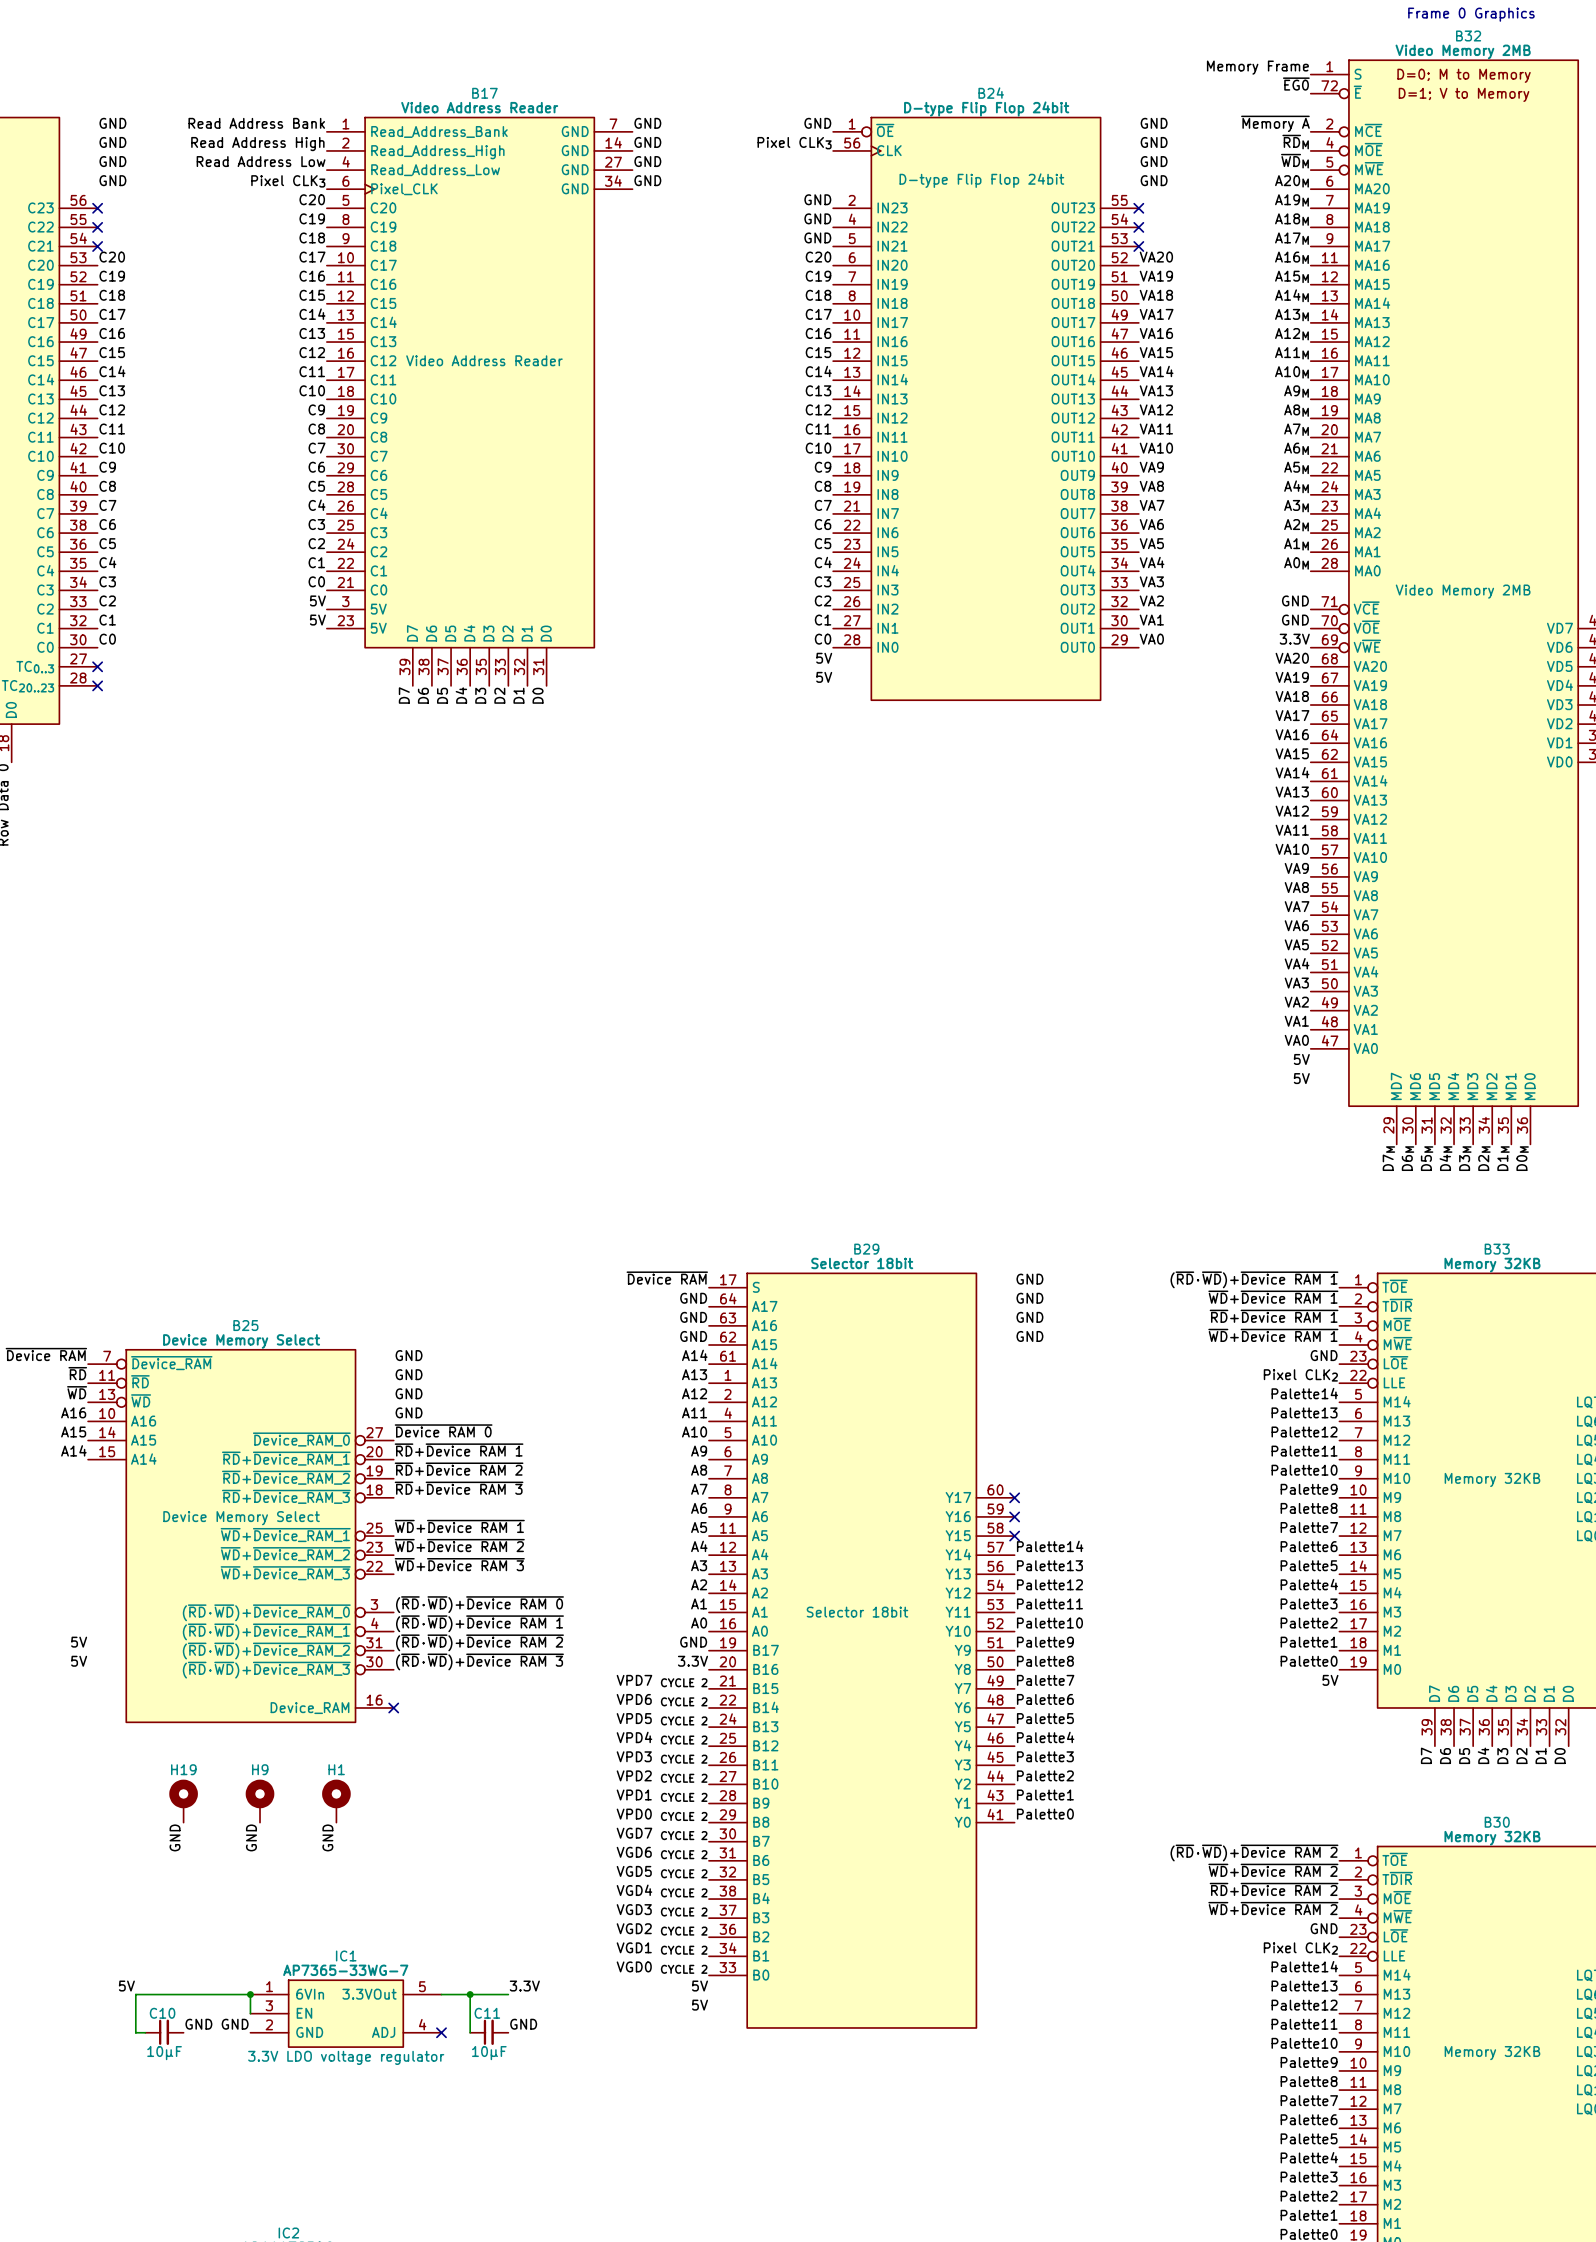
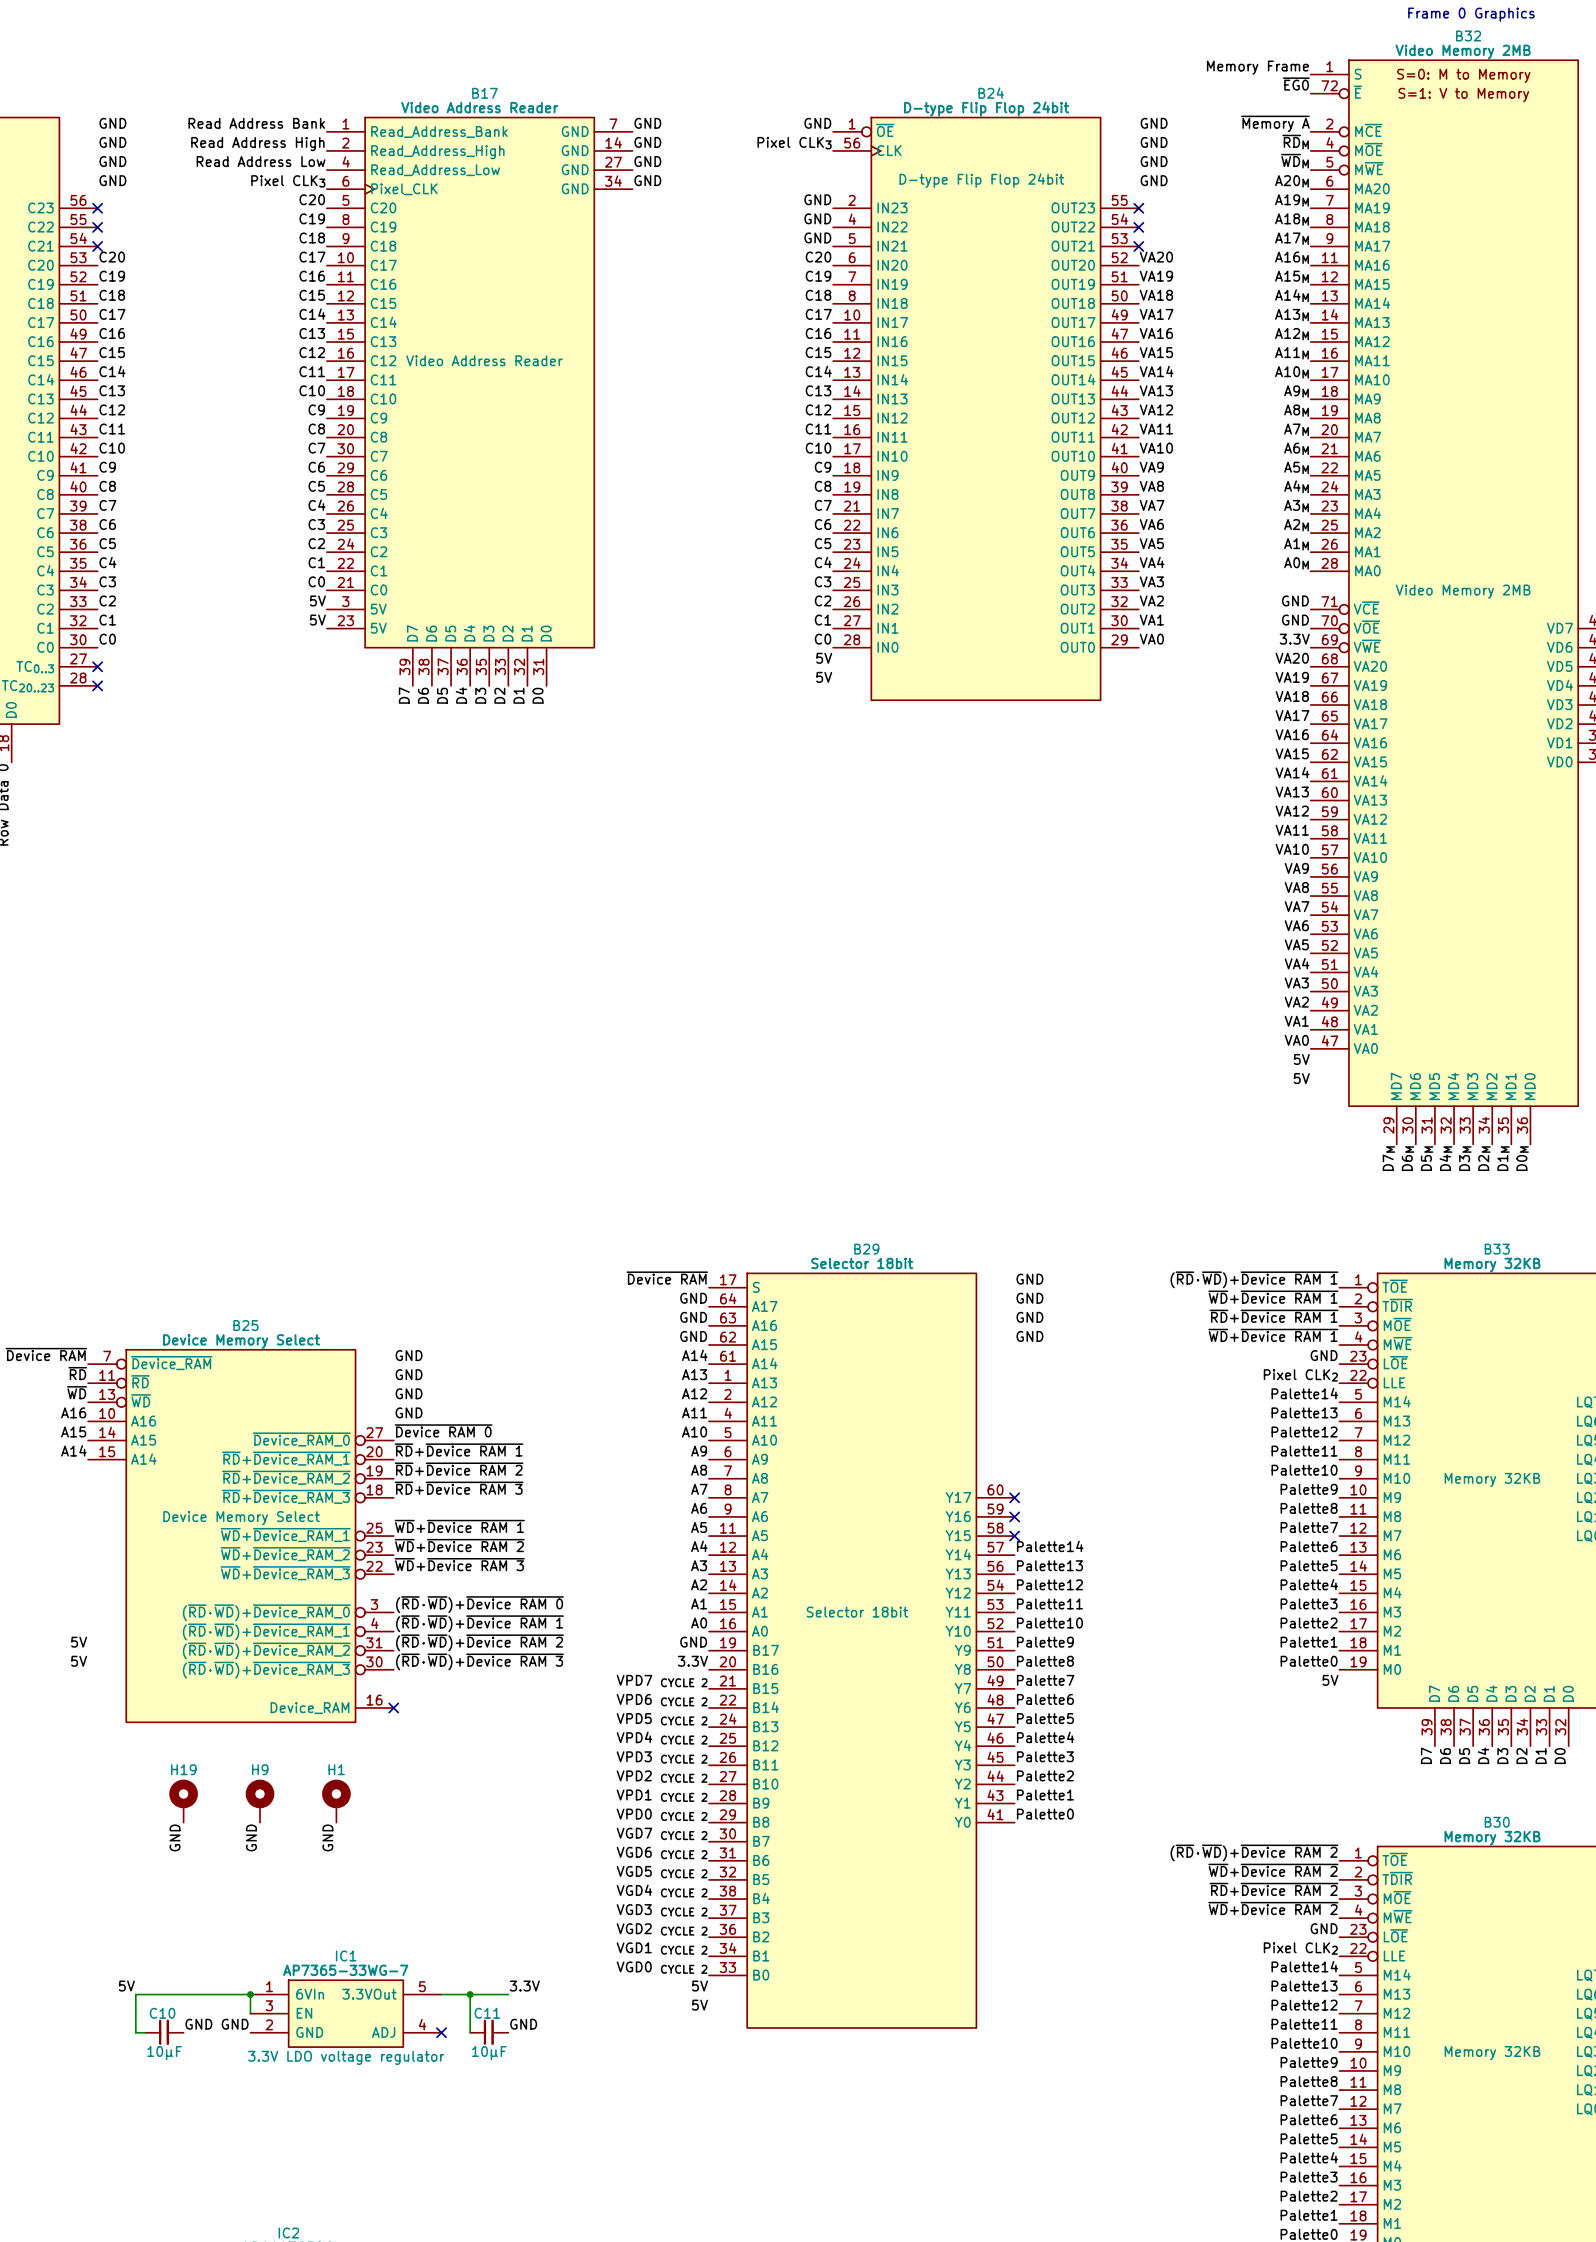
B32 text: D=0; M to Memory (1464, 75) -> S=0: M to Memory (1463, 75)
B32 text: D=1; V to Memory (1464, 94) -> S=1: V to Memory (1463, 94)

